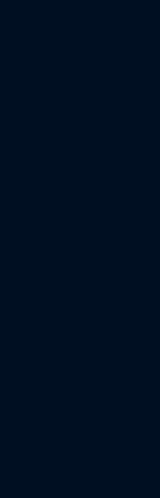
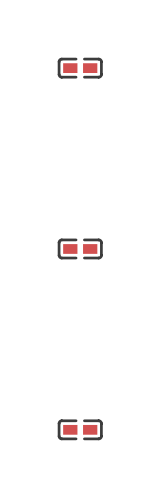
part: none -> (80, 68)
part: none -> (80, 248)
part: none -> (80, 429)

